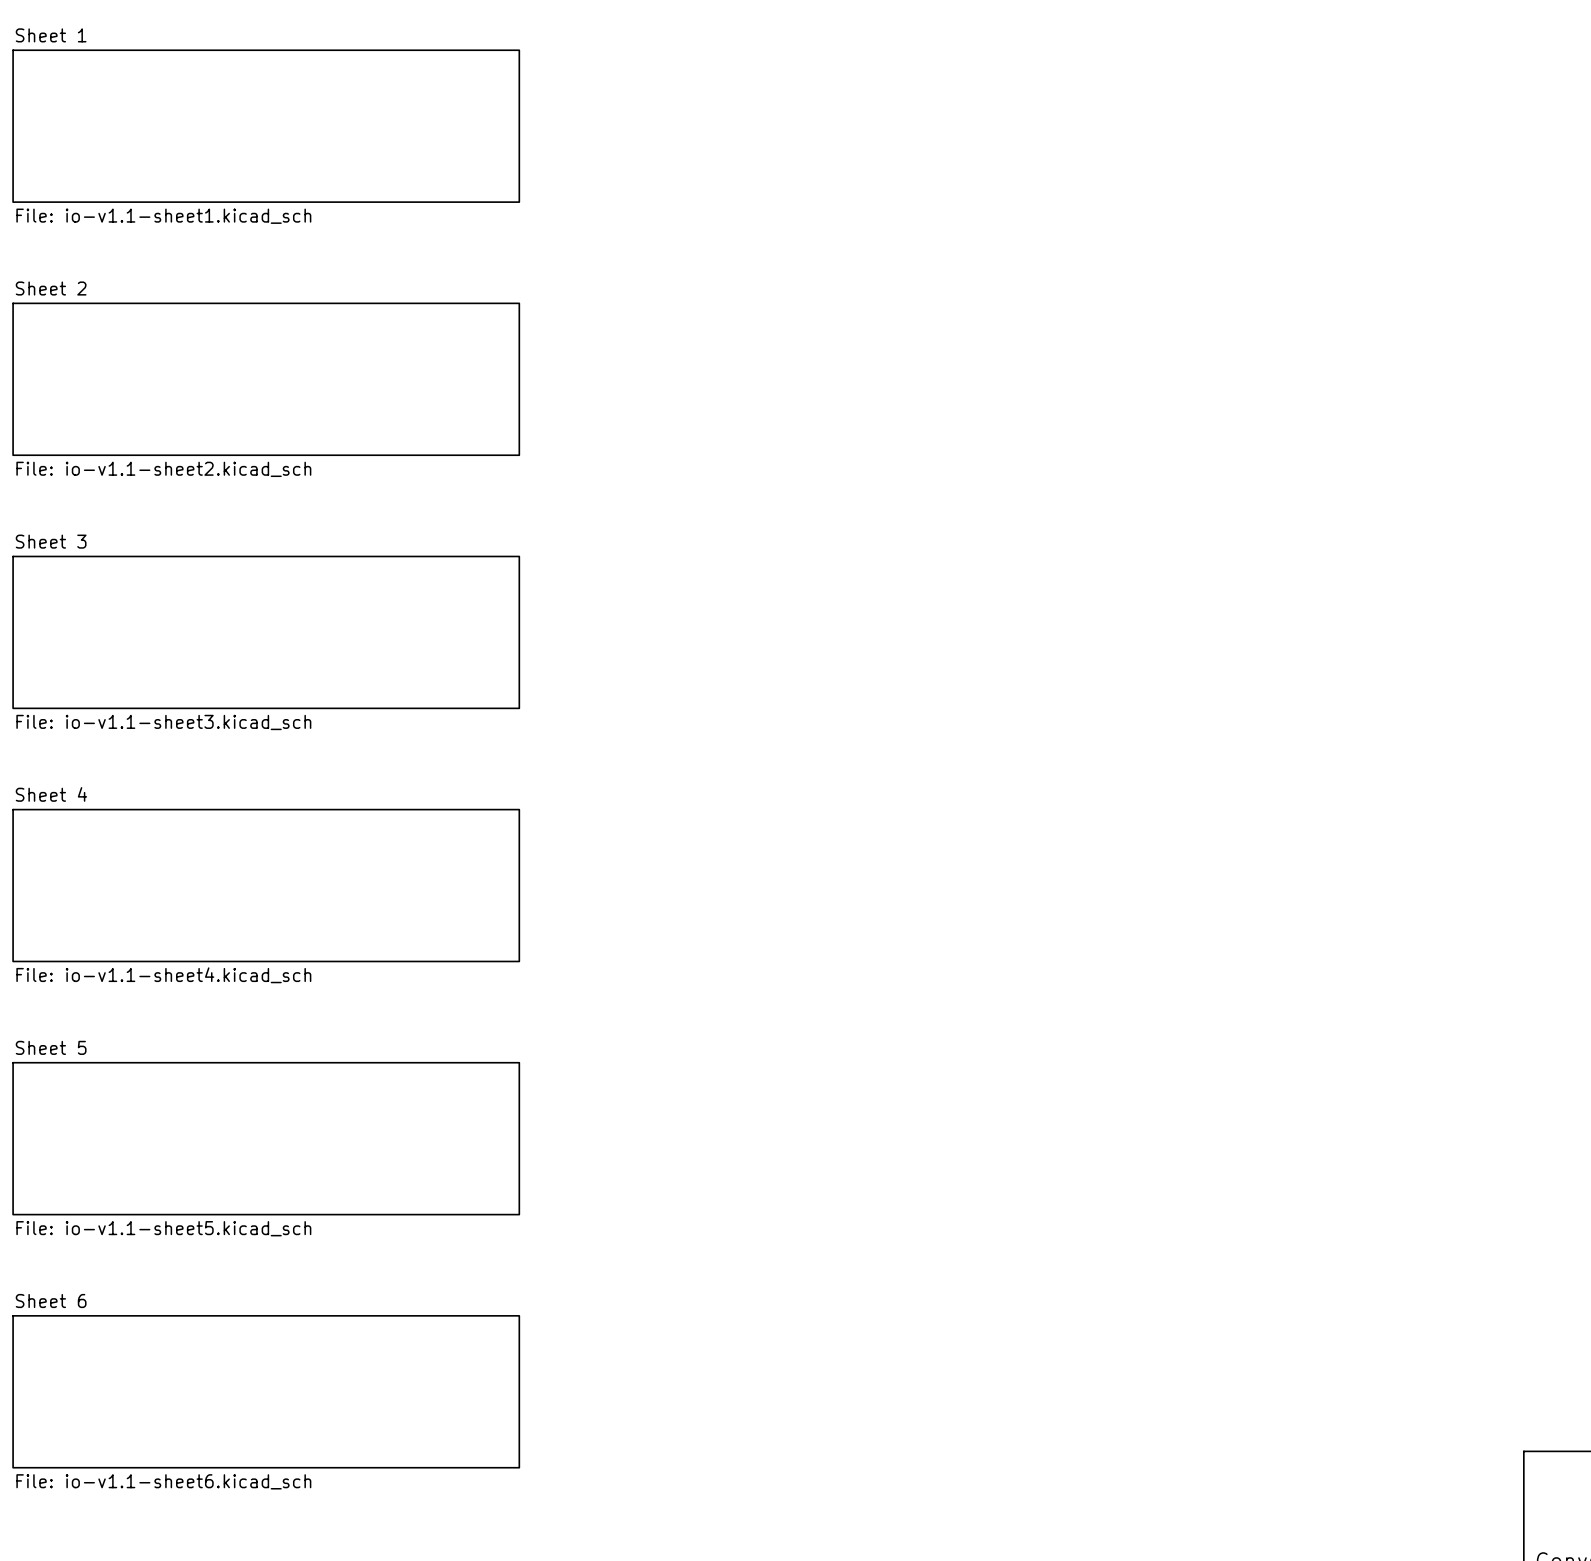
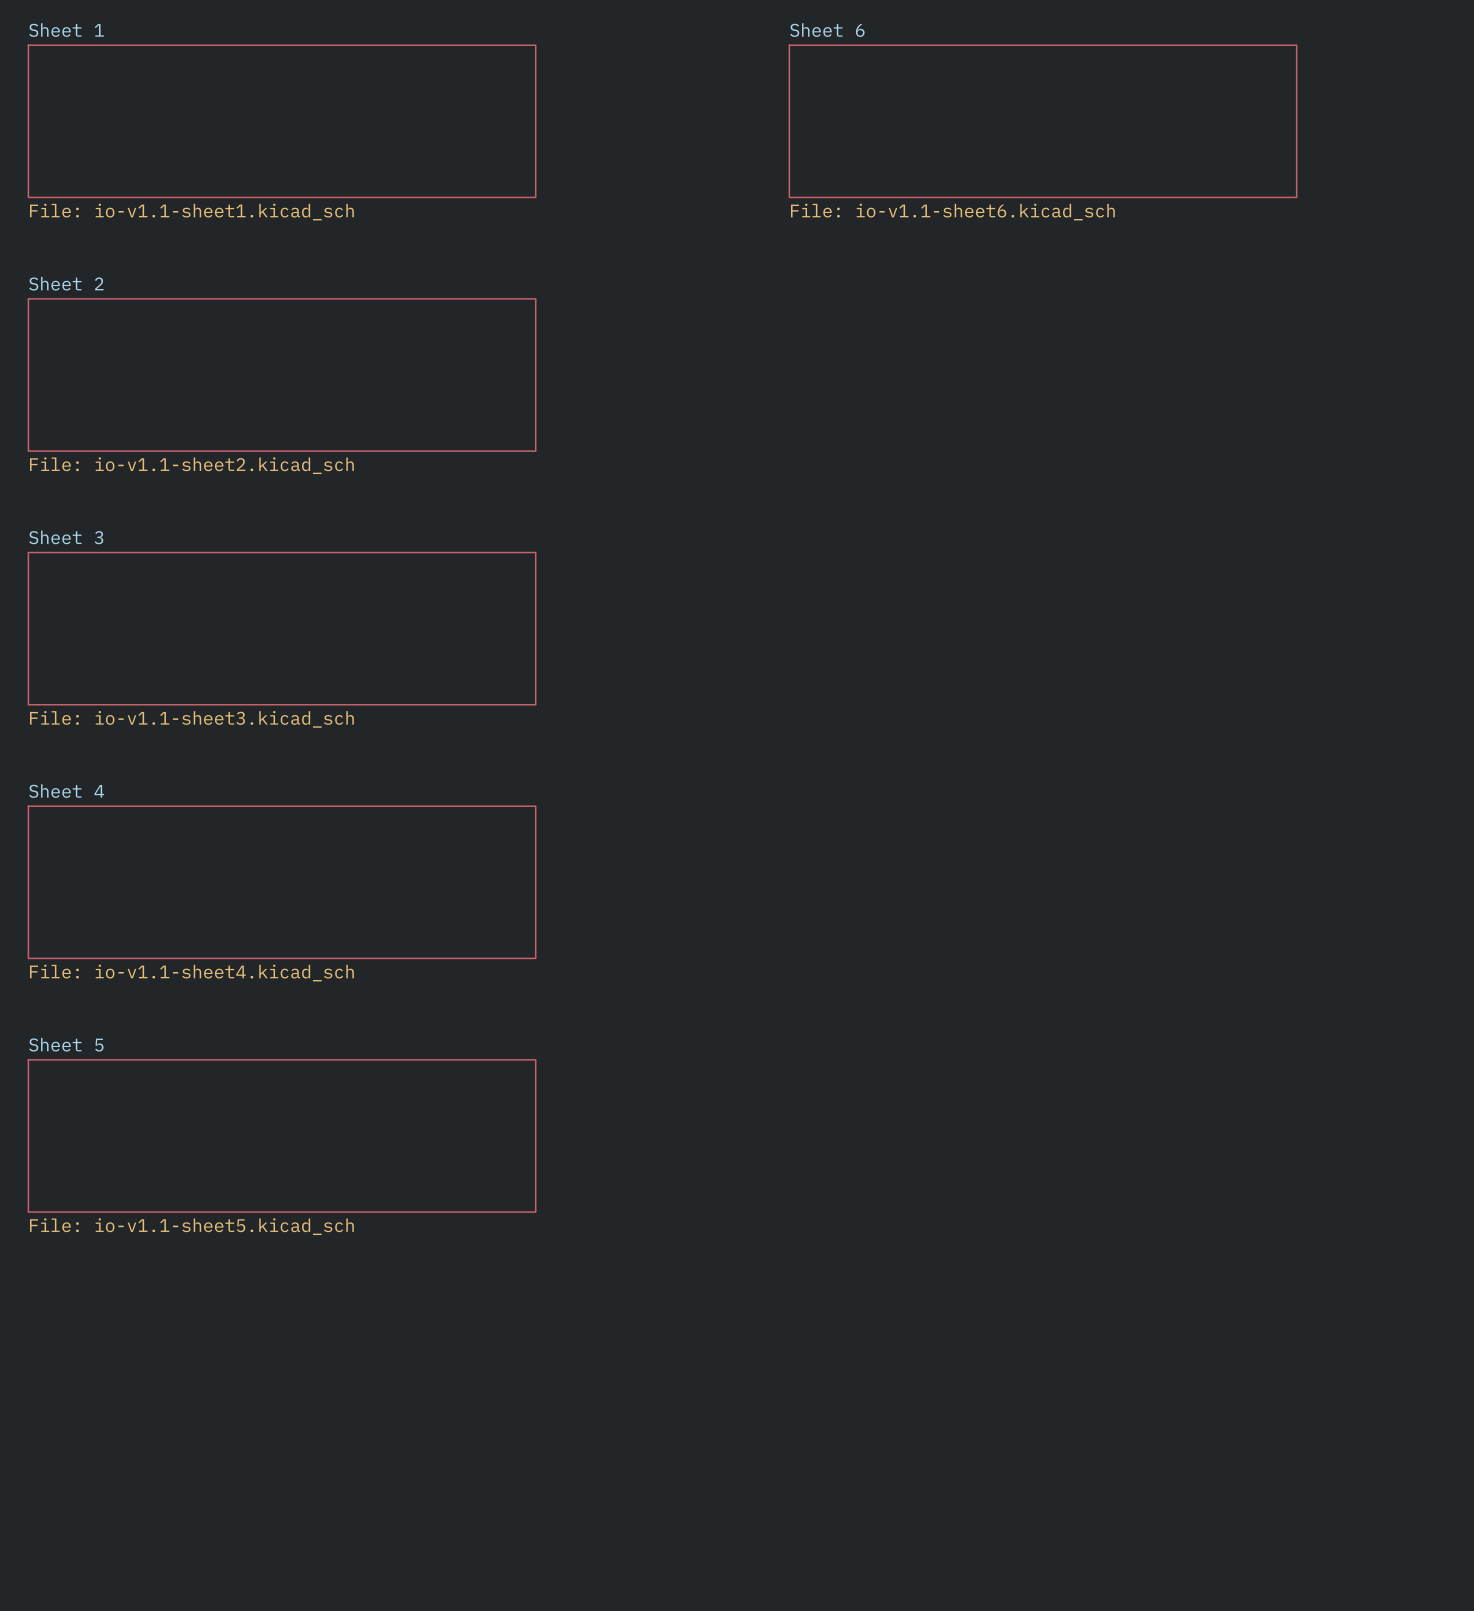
sheet Sheet 6 position: (266, 1391) -> (1043, 121)

